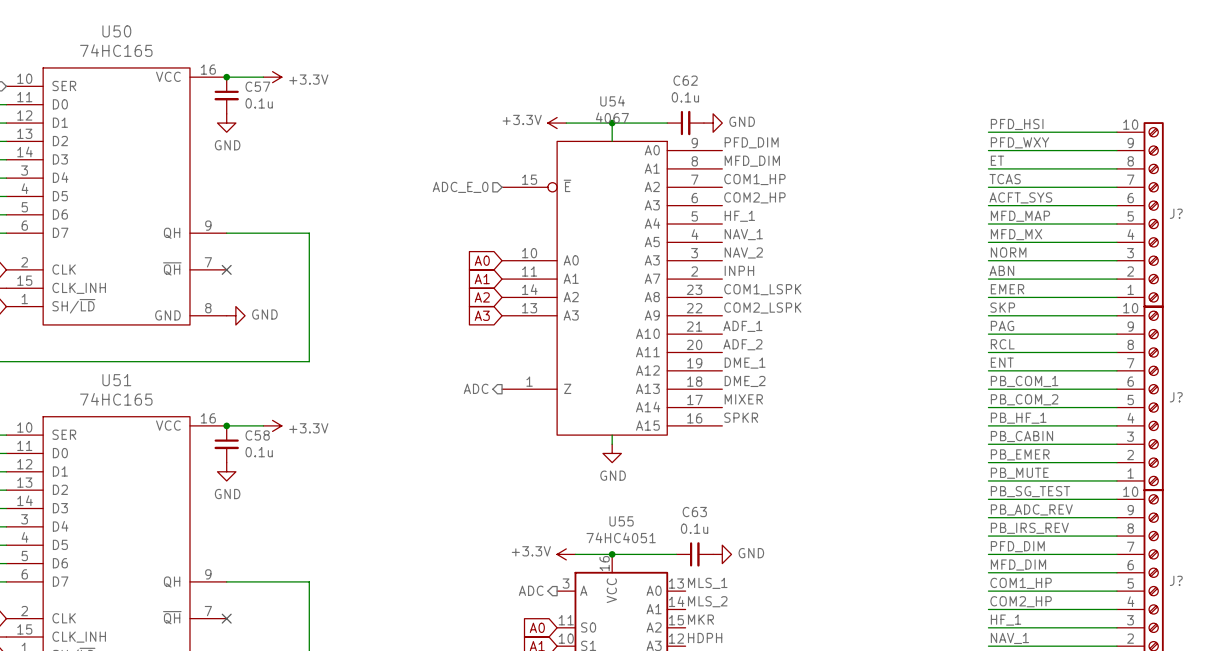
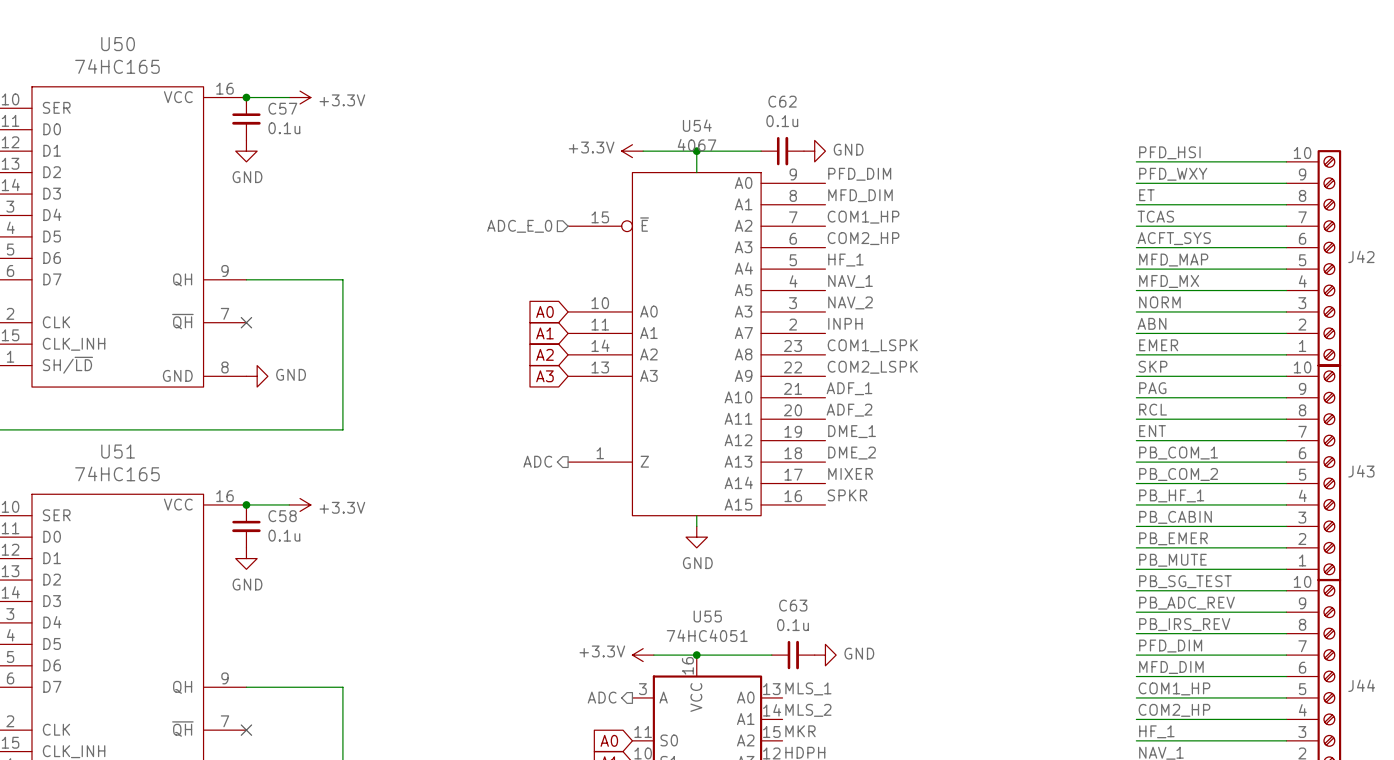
J? name: J? (1176, 213) -> J42 (1361, 256)
J? name: J? (1176, 397) -> J43 (1361, 471)
J? name: J? (1176, 580) -> J44 (1361, 685)

